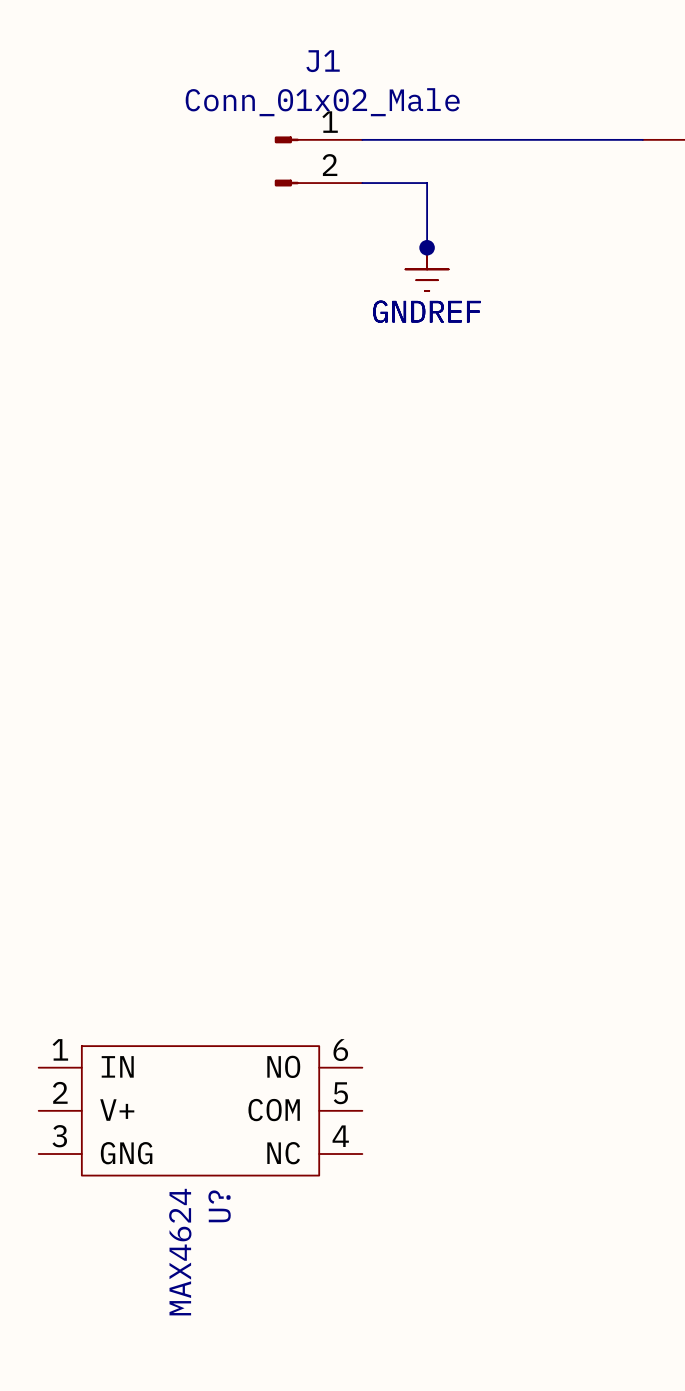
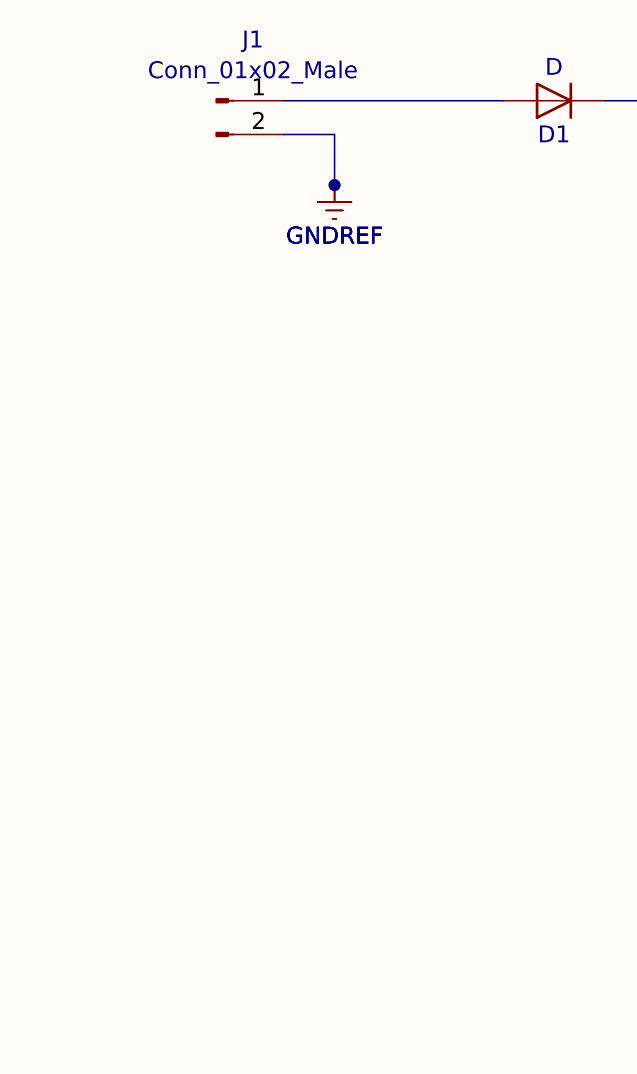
U?: MAX4624 (200, 1110) -> none

